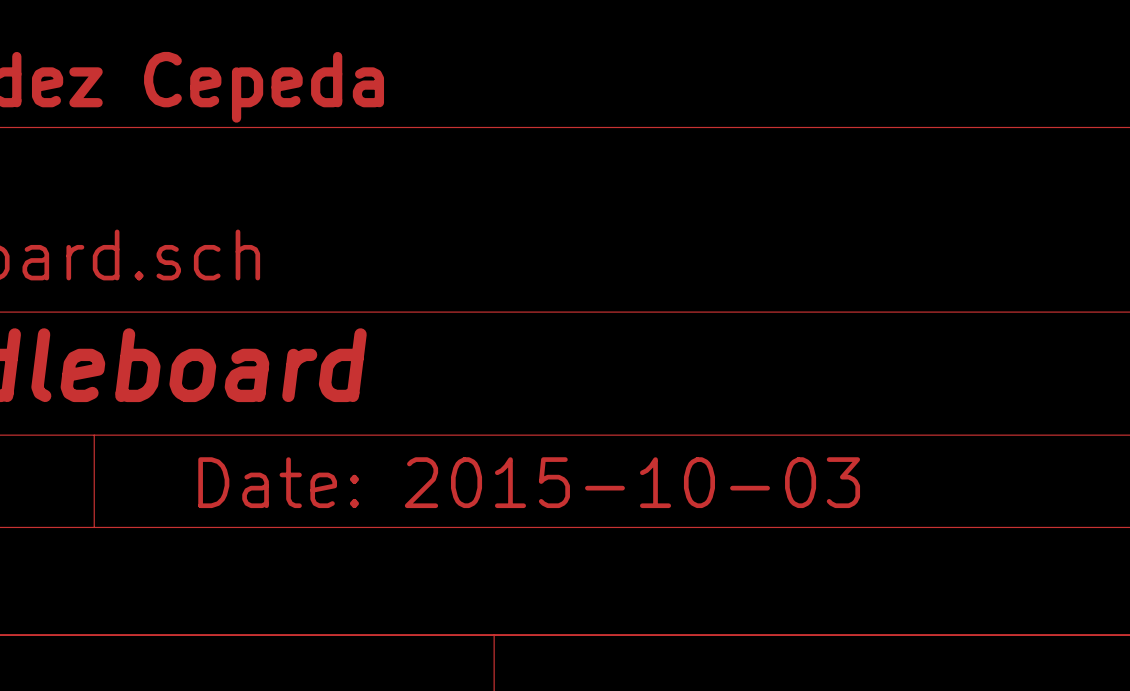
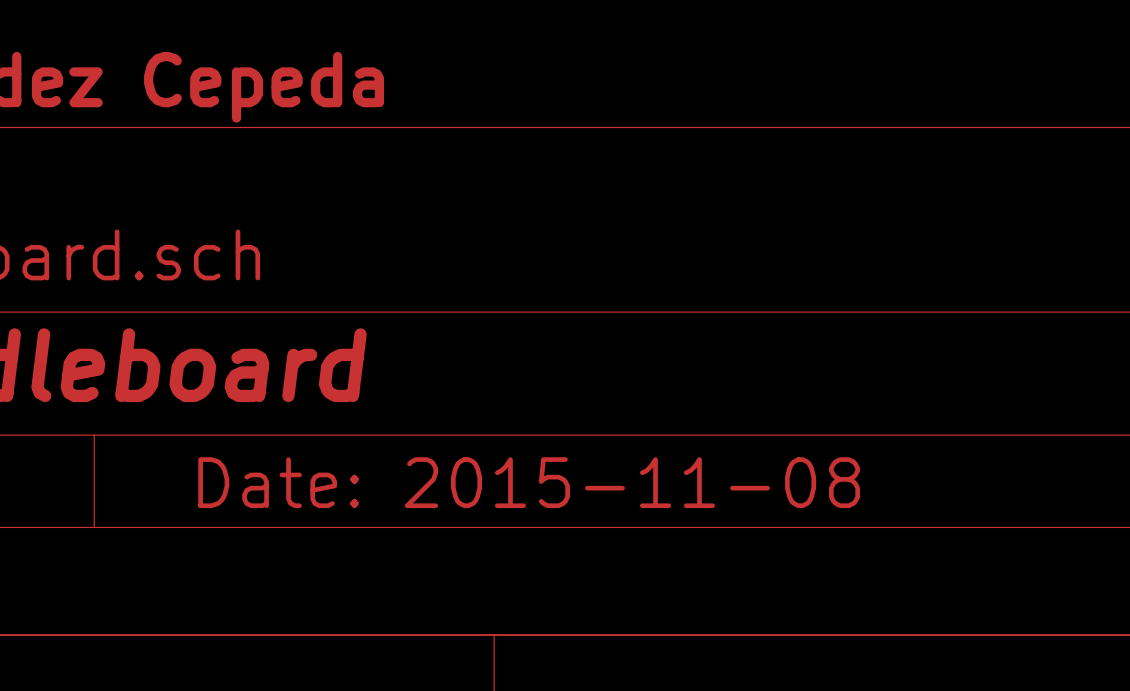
title block: Date: 2015-10-03 (529, 482) -> Date: 2015-11-08 (529, 482)

